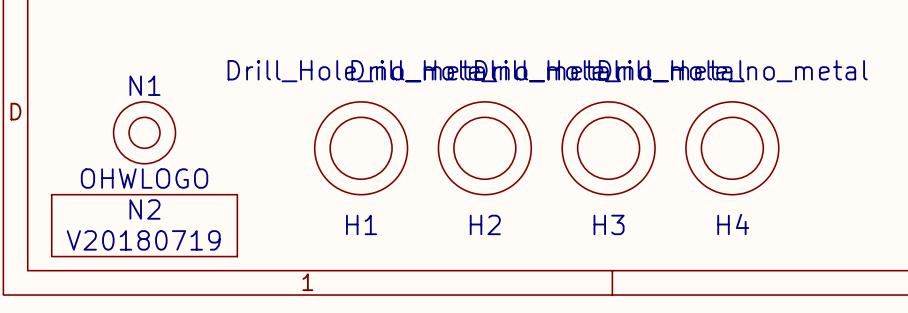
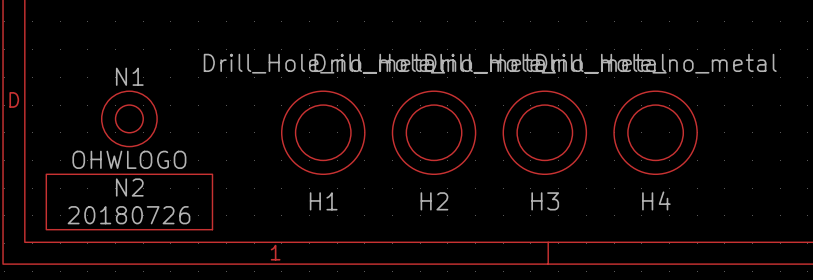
N2 value: V20180719 (143, 240) -> 20180726 (129, 215)

